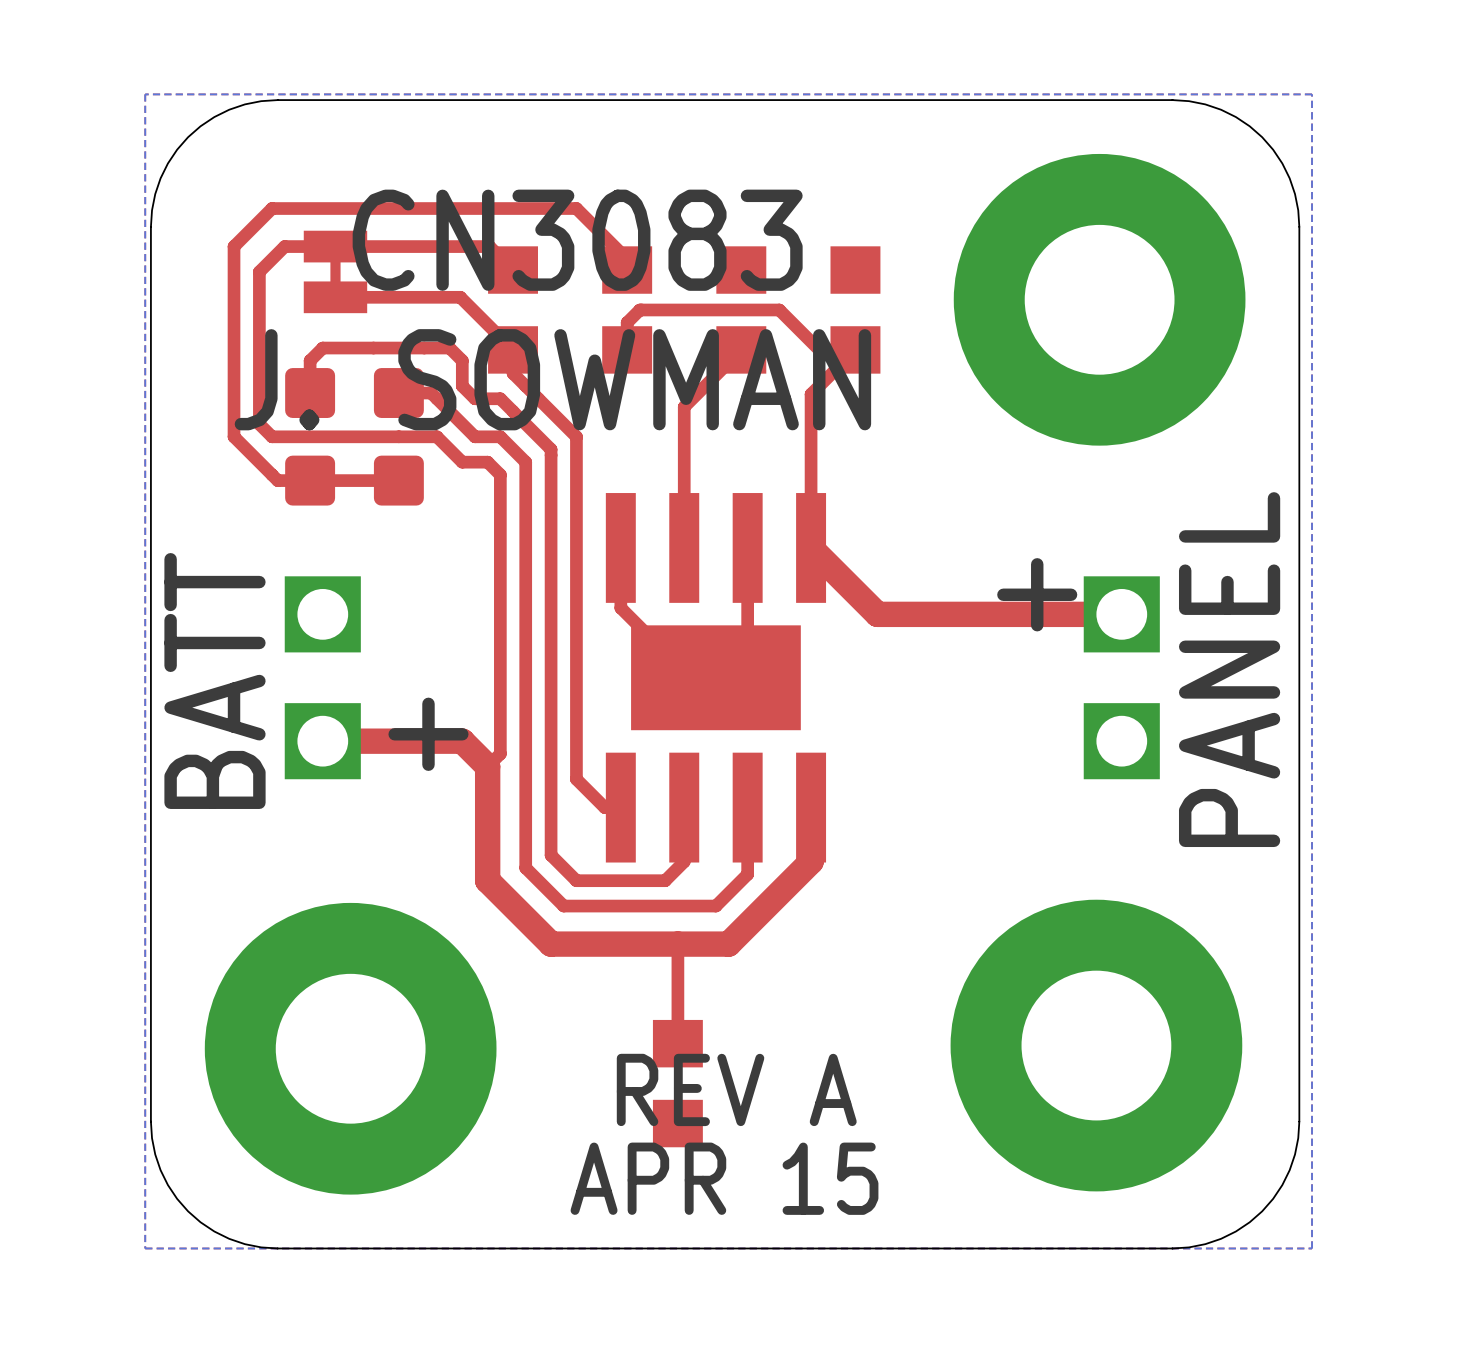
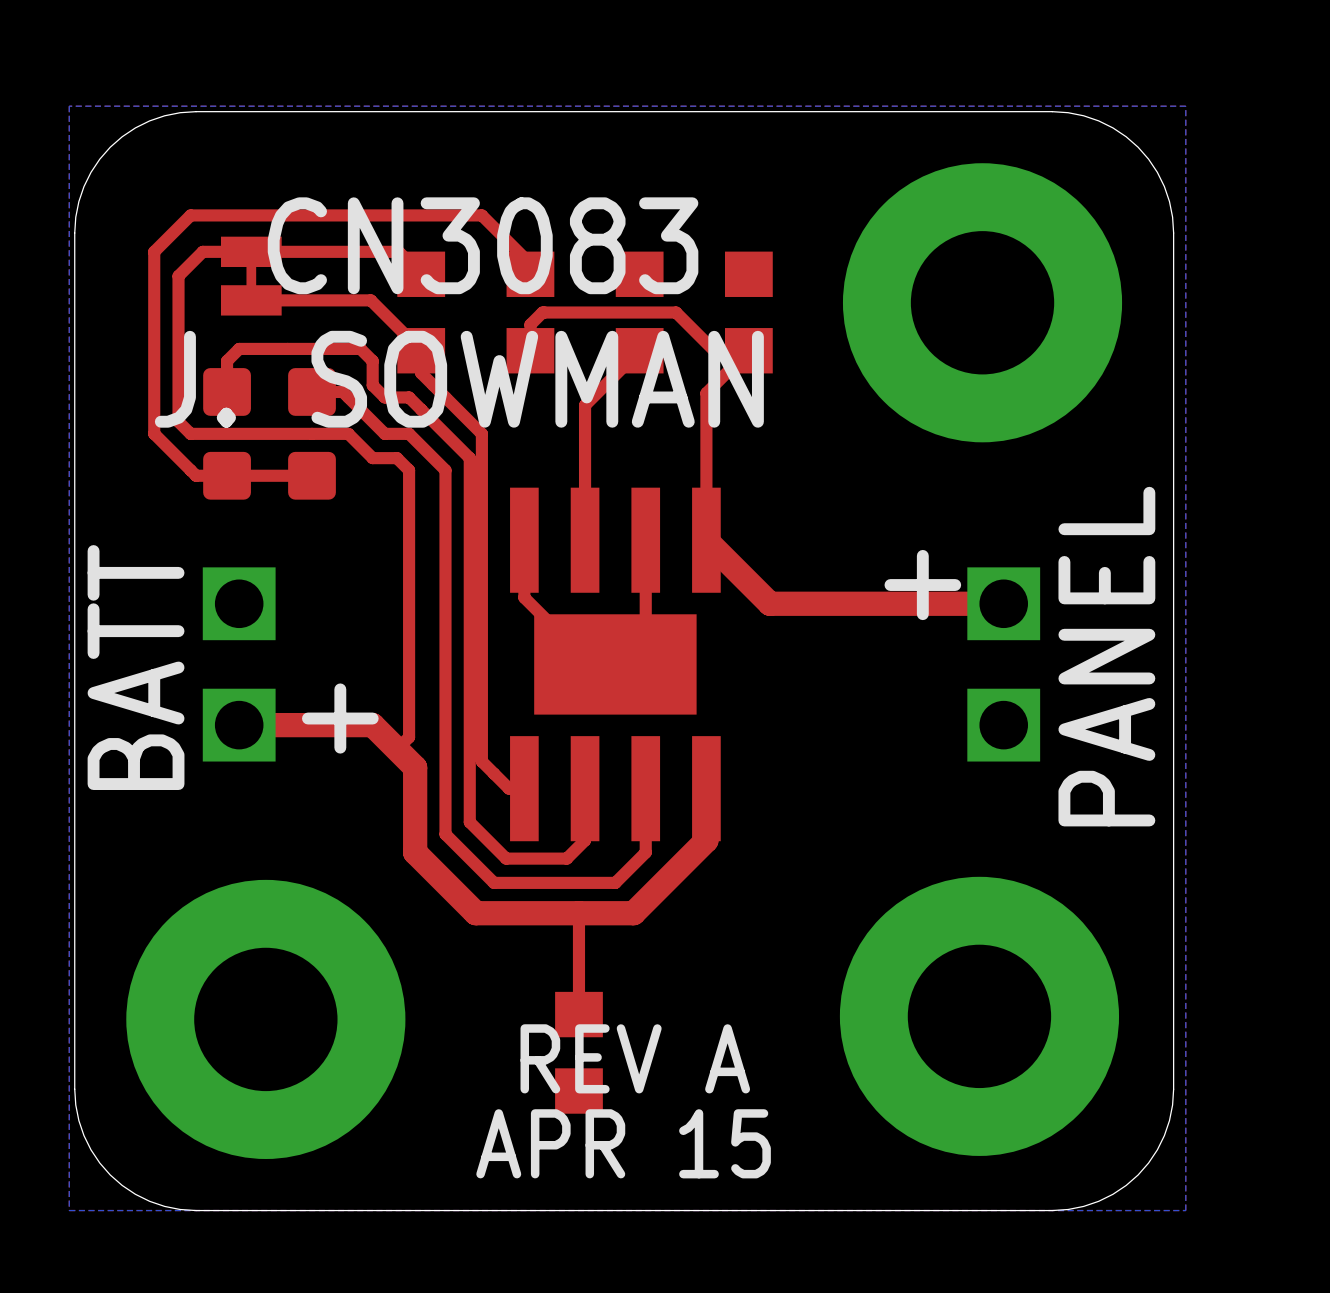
top track: (551, 449) (551, 855) (576, 880) (601, 880) -> (457, 446) (469, 458) (469, 822) (506, 858)
top track: (525, 462) (525, 868) (563, 906) (589, 906) -> (433, 458) (445, 470) (445, 834) (494, 882)
top track: (487, 766) (487, 880) (551, 944) (728, 944) (734, 937) -> (396, 749) (415, 767) (415, 852) (475, 913) (633, 913)

